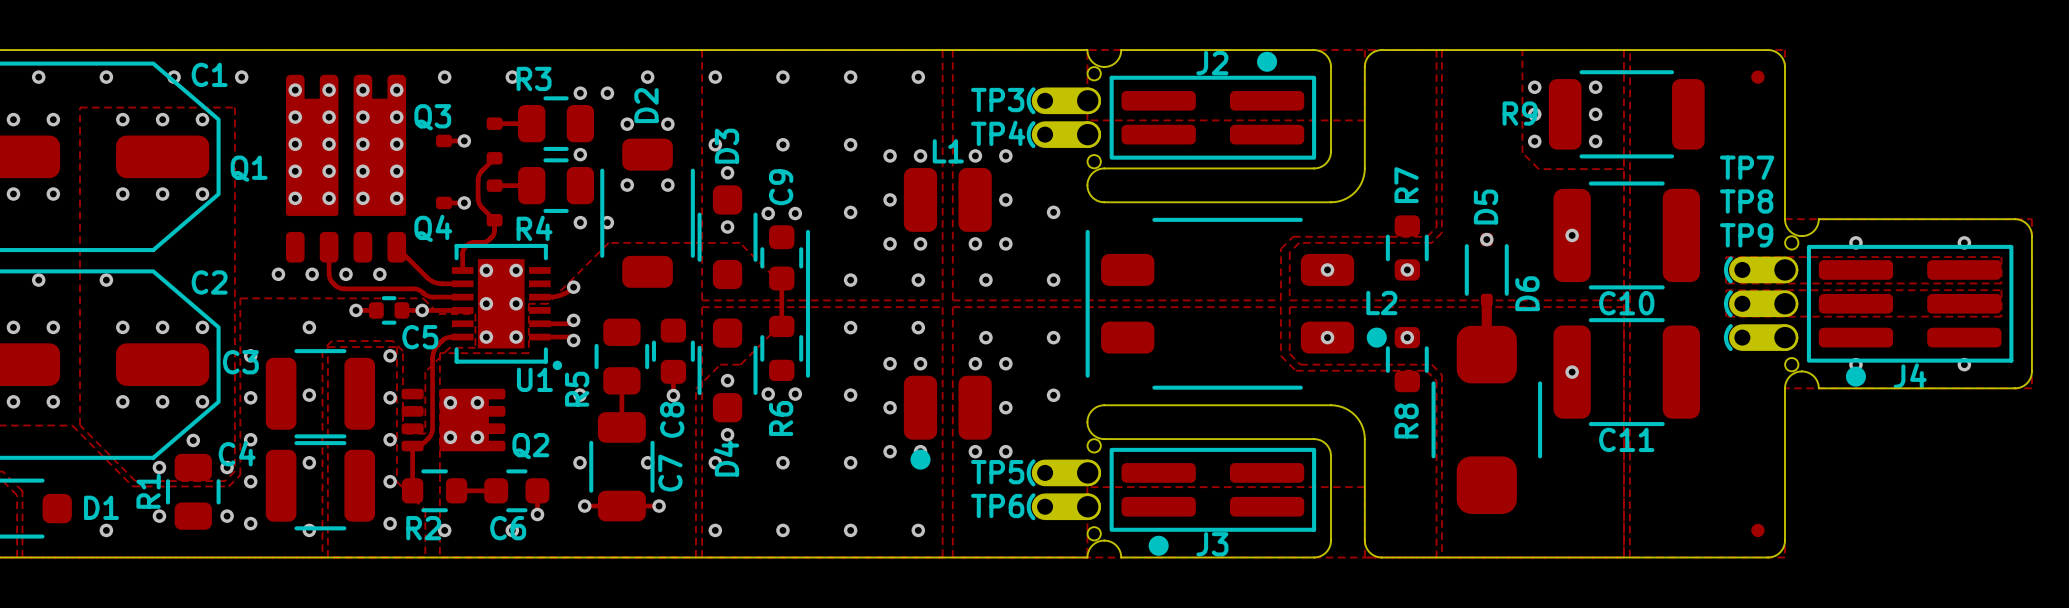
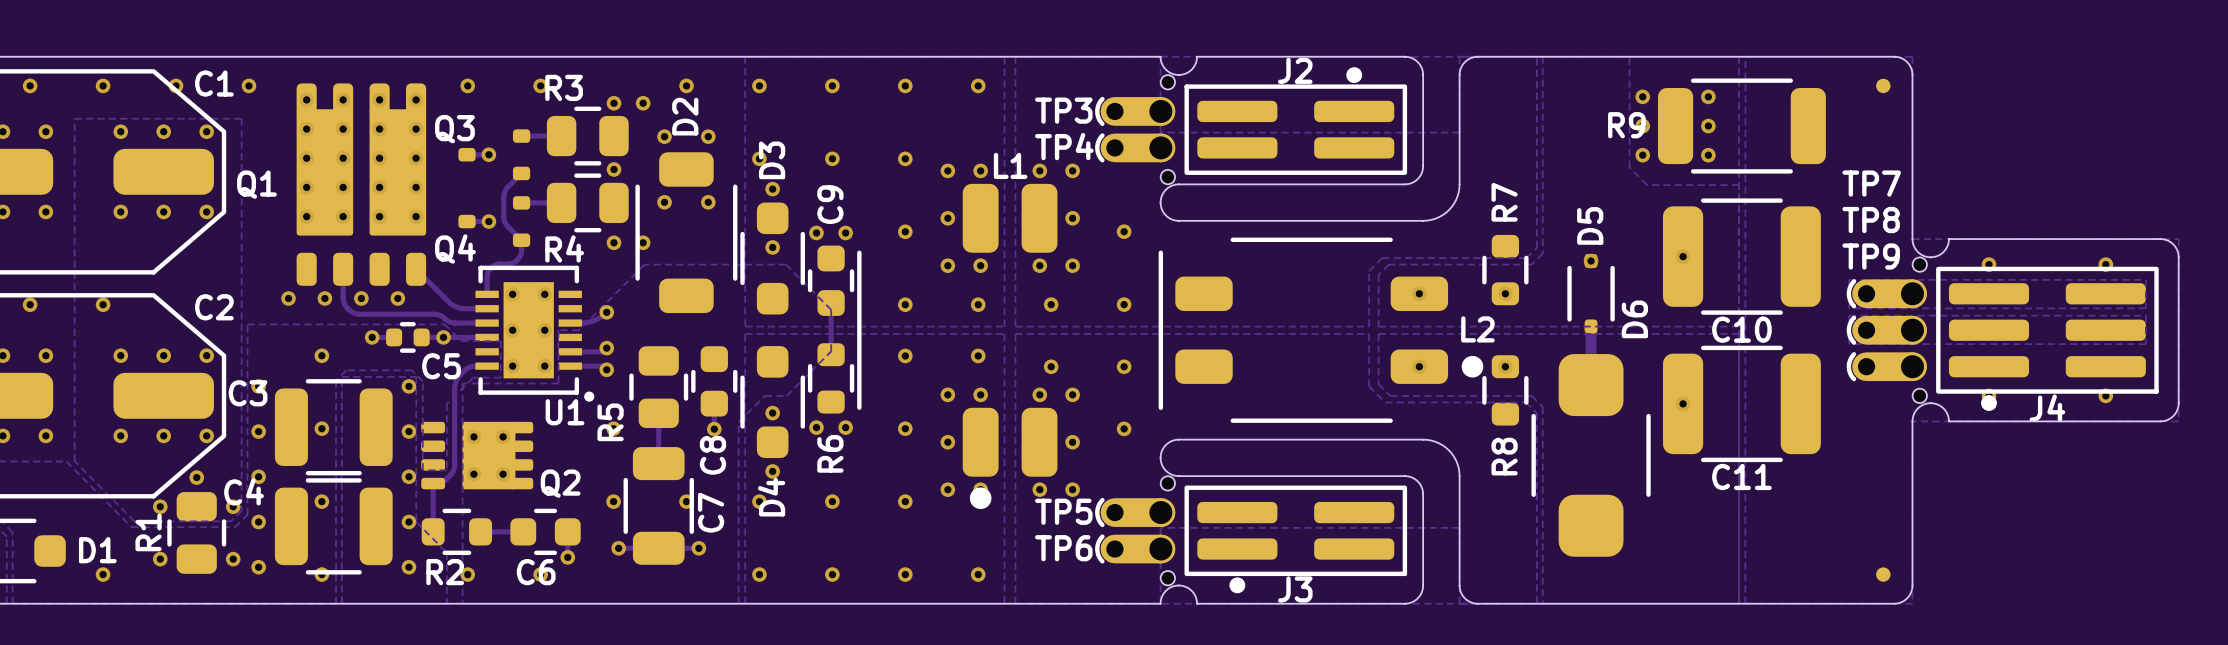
J2 footprint: [1109, 51, 1317, 160] -> [1184, 67, 1408, 175]
J4 footprint: [1806, 244, 2014, 387] -> [1936, 266, 2159, 411]
J3 footprint: [1109, 447, 1317, 556] -> [1184, 485, 1408, 594]

